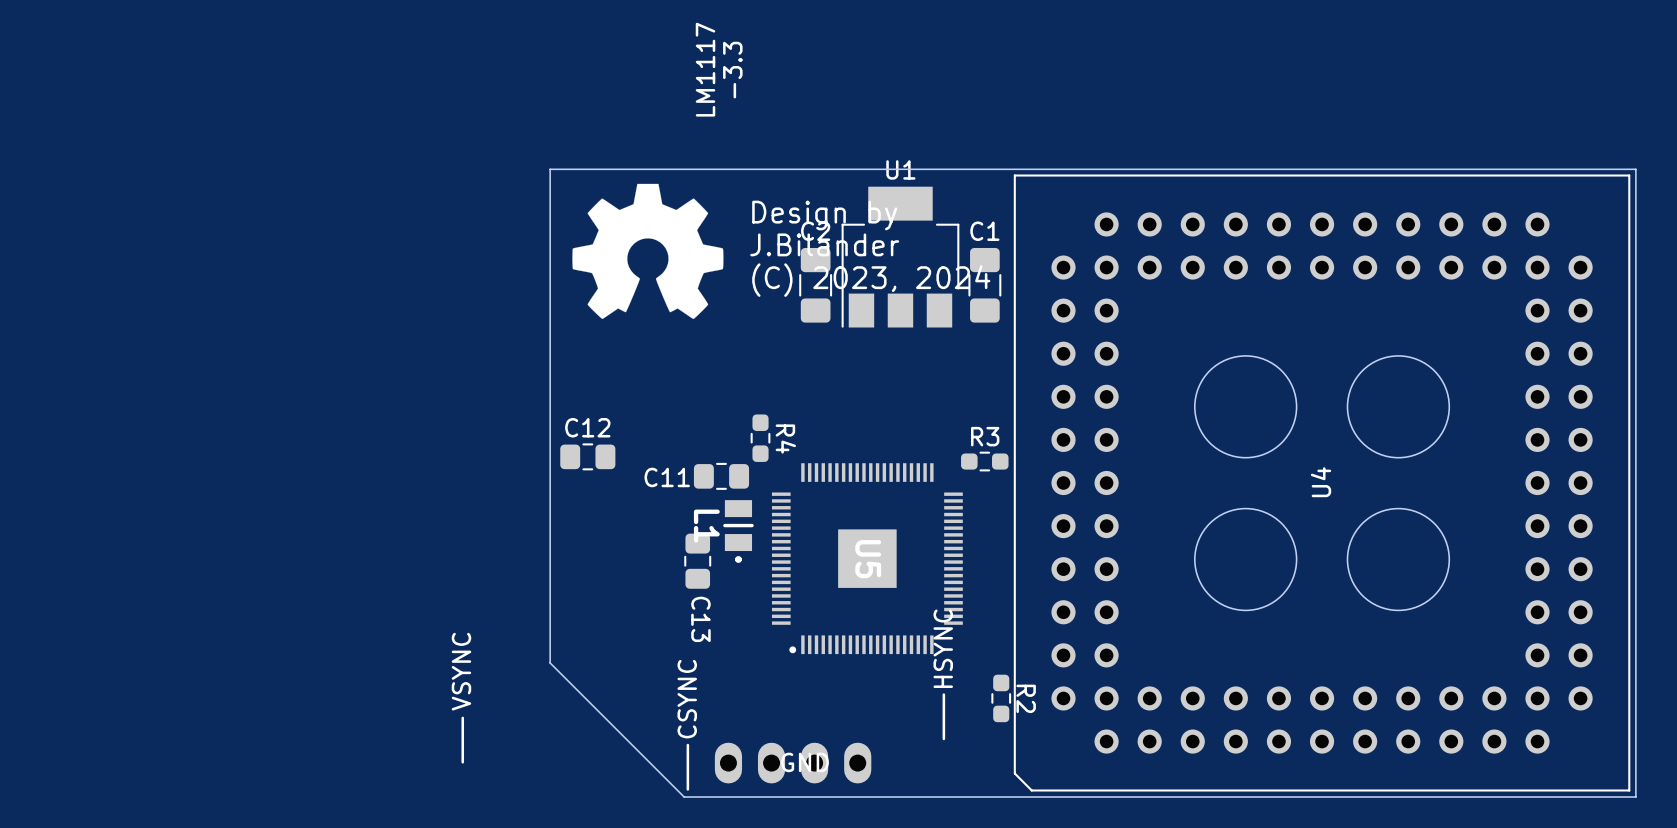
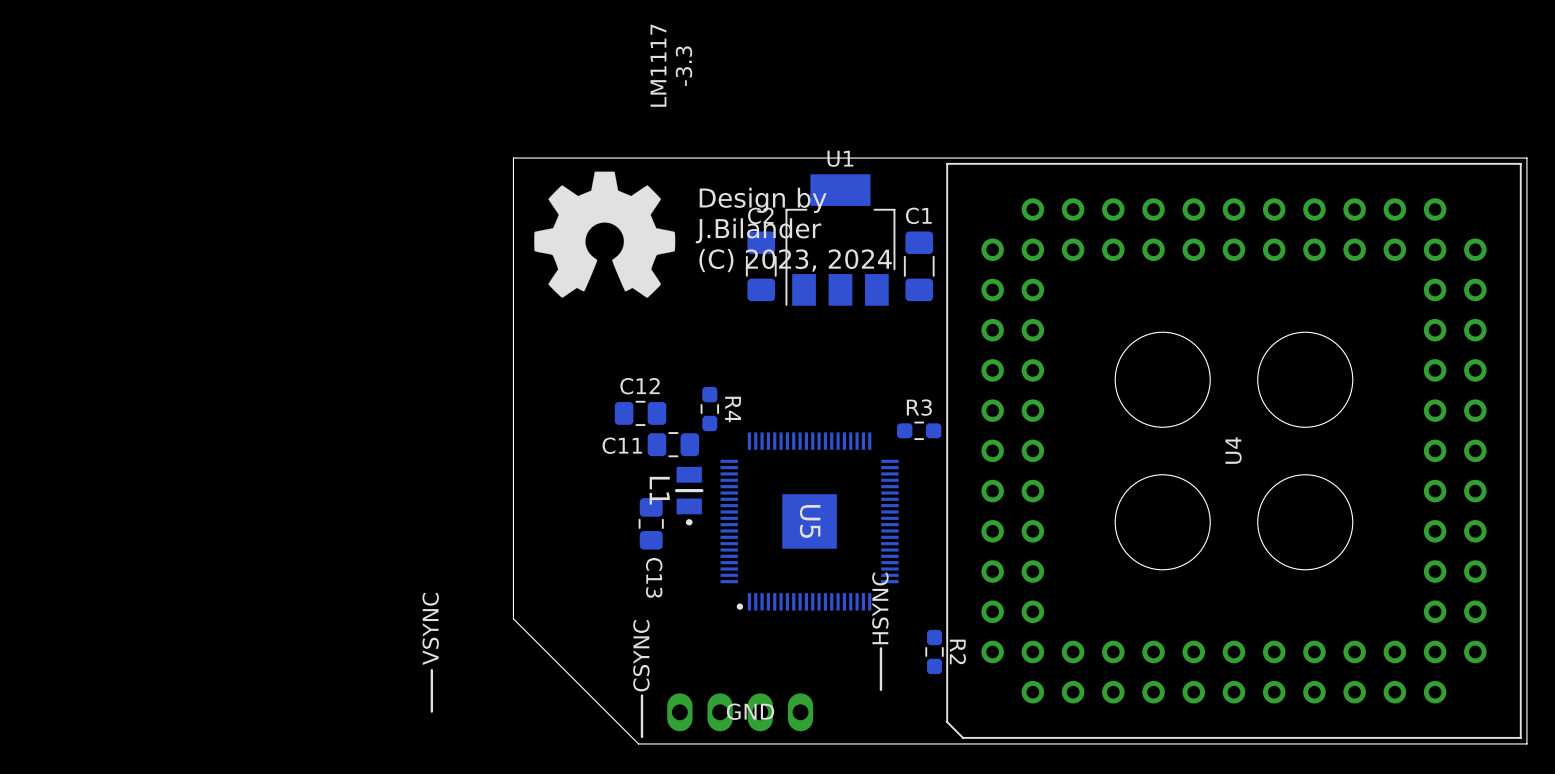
C12 position: (587, 456) -> (640, 413)

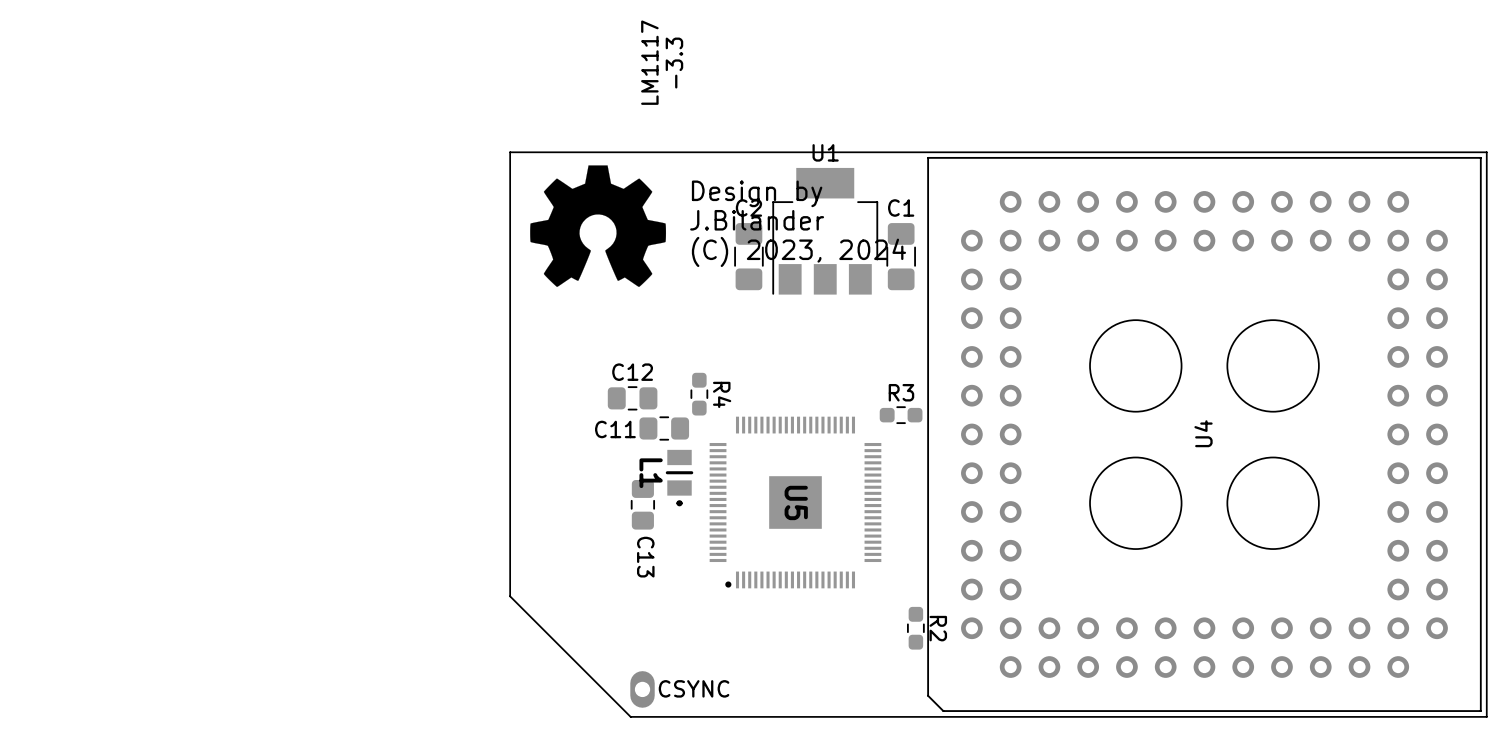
text: HSYNC (880, 608) -> none
text: VSYNC (430, 628) -> none
line: (880, 648) (880, 689) -> none
text rotation: 0° (641, 655) -> 90° clockwise (694, 688)
text position: CSYNC (641, 655) -> CSYNC (694, 688)
line: (431, 670) (431, 711) -> none
line: (641, 695) (641, 736) -> none
text: GND (750, 711) -> none
part: (740, 712) -> none
part: none -> (642, 689)

